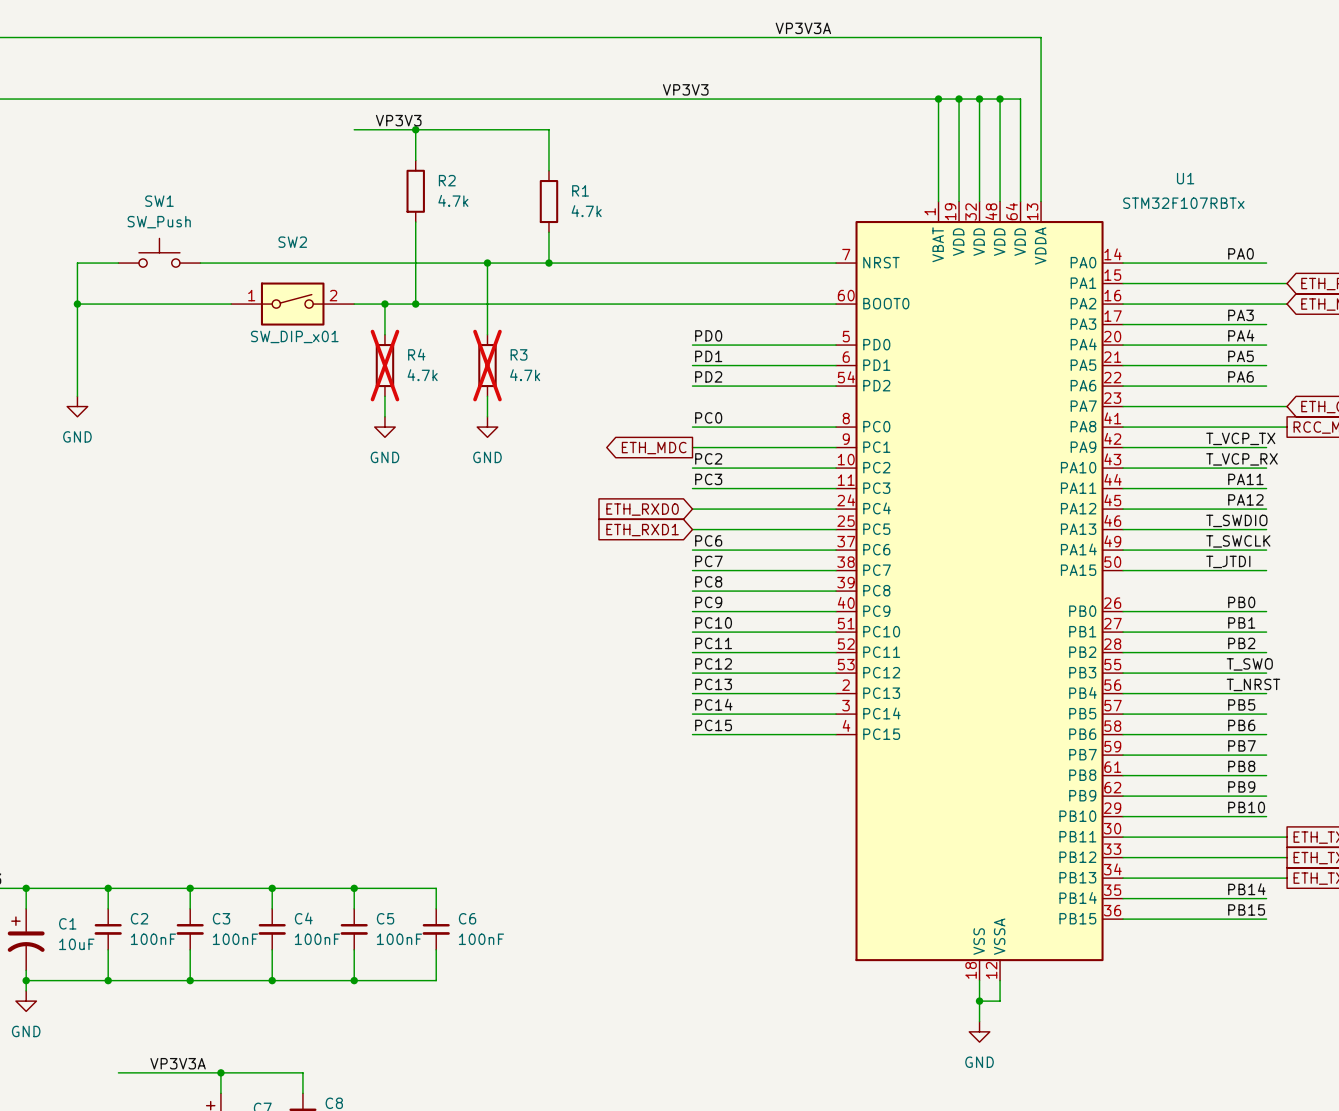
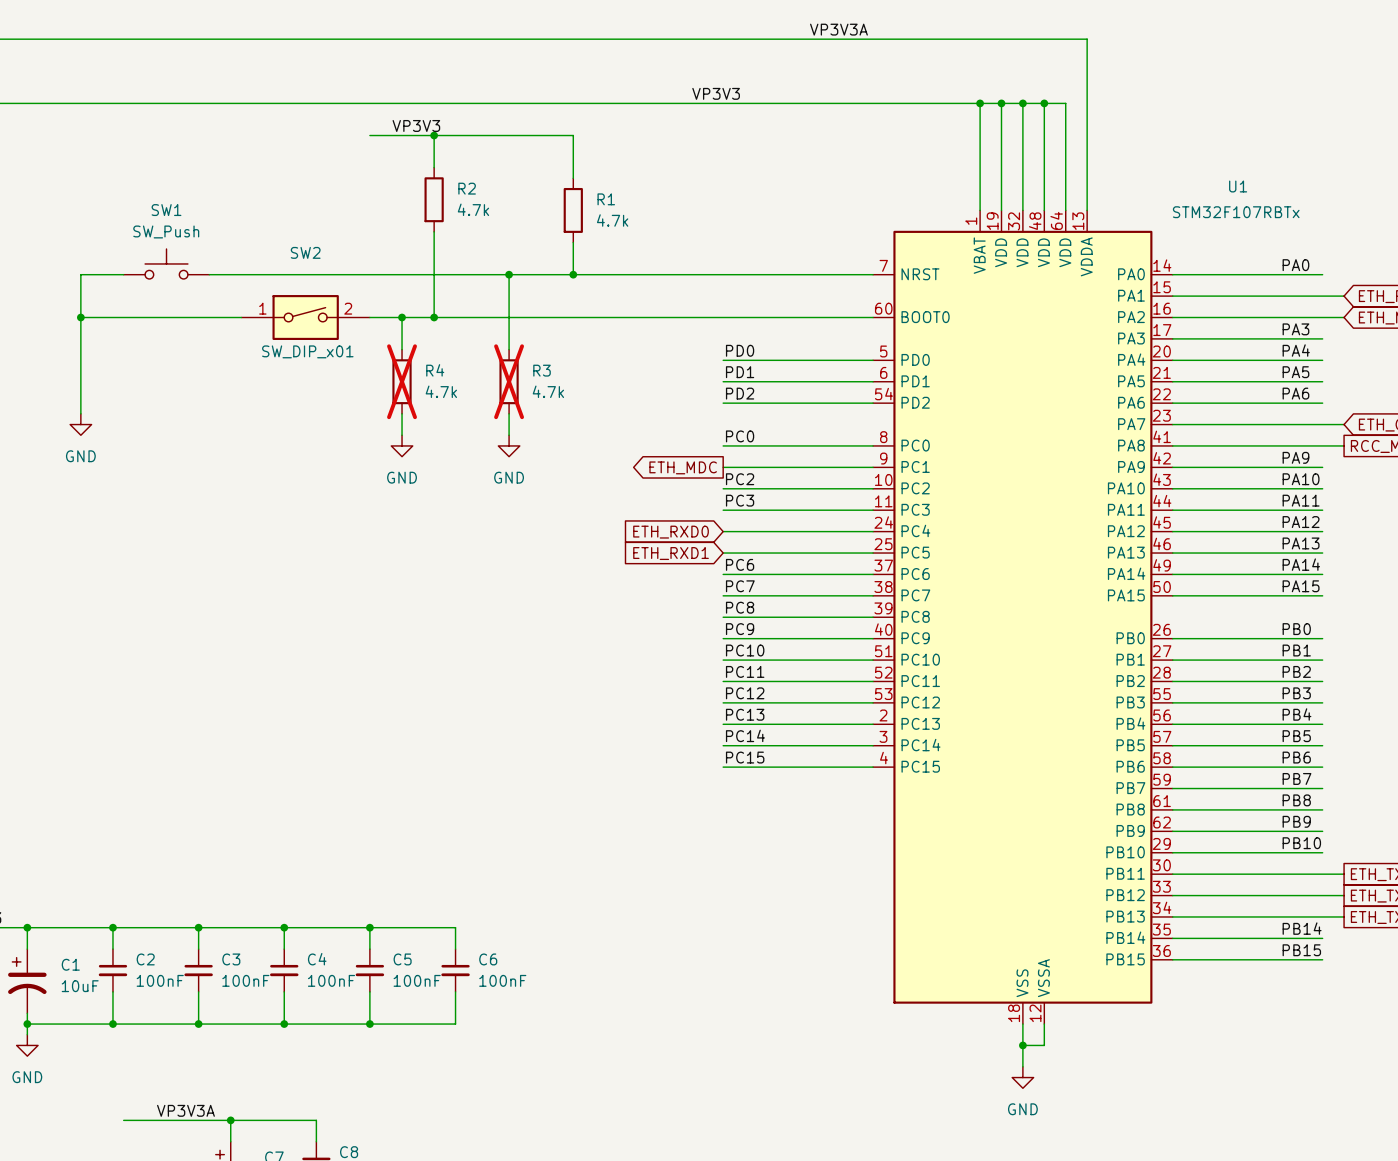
label: T_VCP_TX (1240, 438) -> none
label: none -> PA9 (1295, 457)
label: none -> PA10 (1301, 479)
label: T_VCP_RX (1241, 459) -> none
label: T_SWDIO (1236, 520) -> none
label: none -> PA13 (1301, 543)
label: none -> PA14 (1301, 564)
label: T_SWCLK (1238, 541) -> none
label: T_JTDI (1228, 561) -> none
label: none -> PA15 (1301, 586)
label: T_SWO (1249, 664) -> PB3 (1296, 693)
label: T_NRST (1253, 684) -> PB4 (1296, 714)

